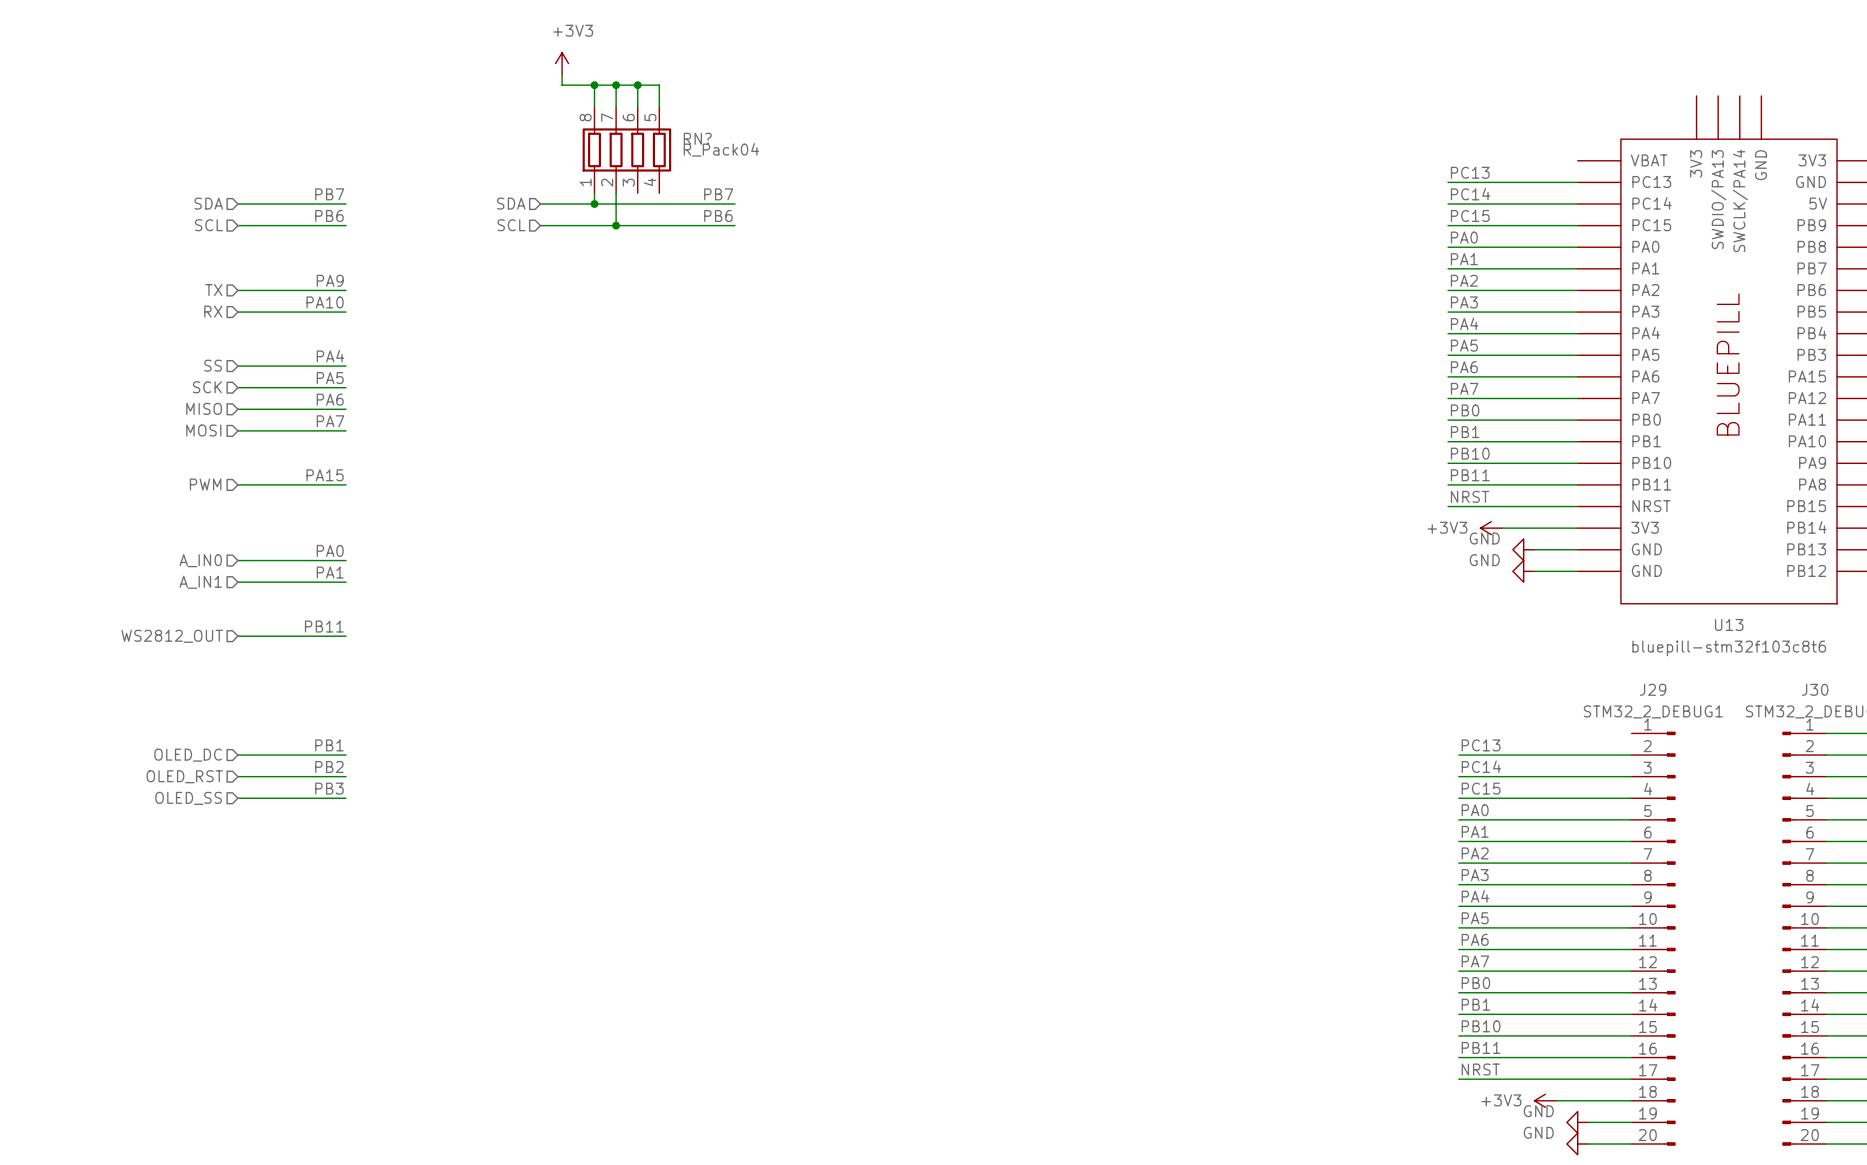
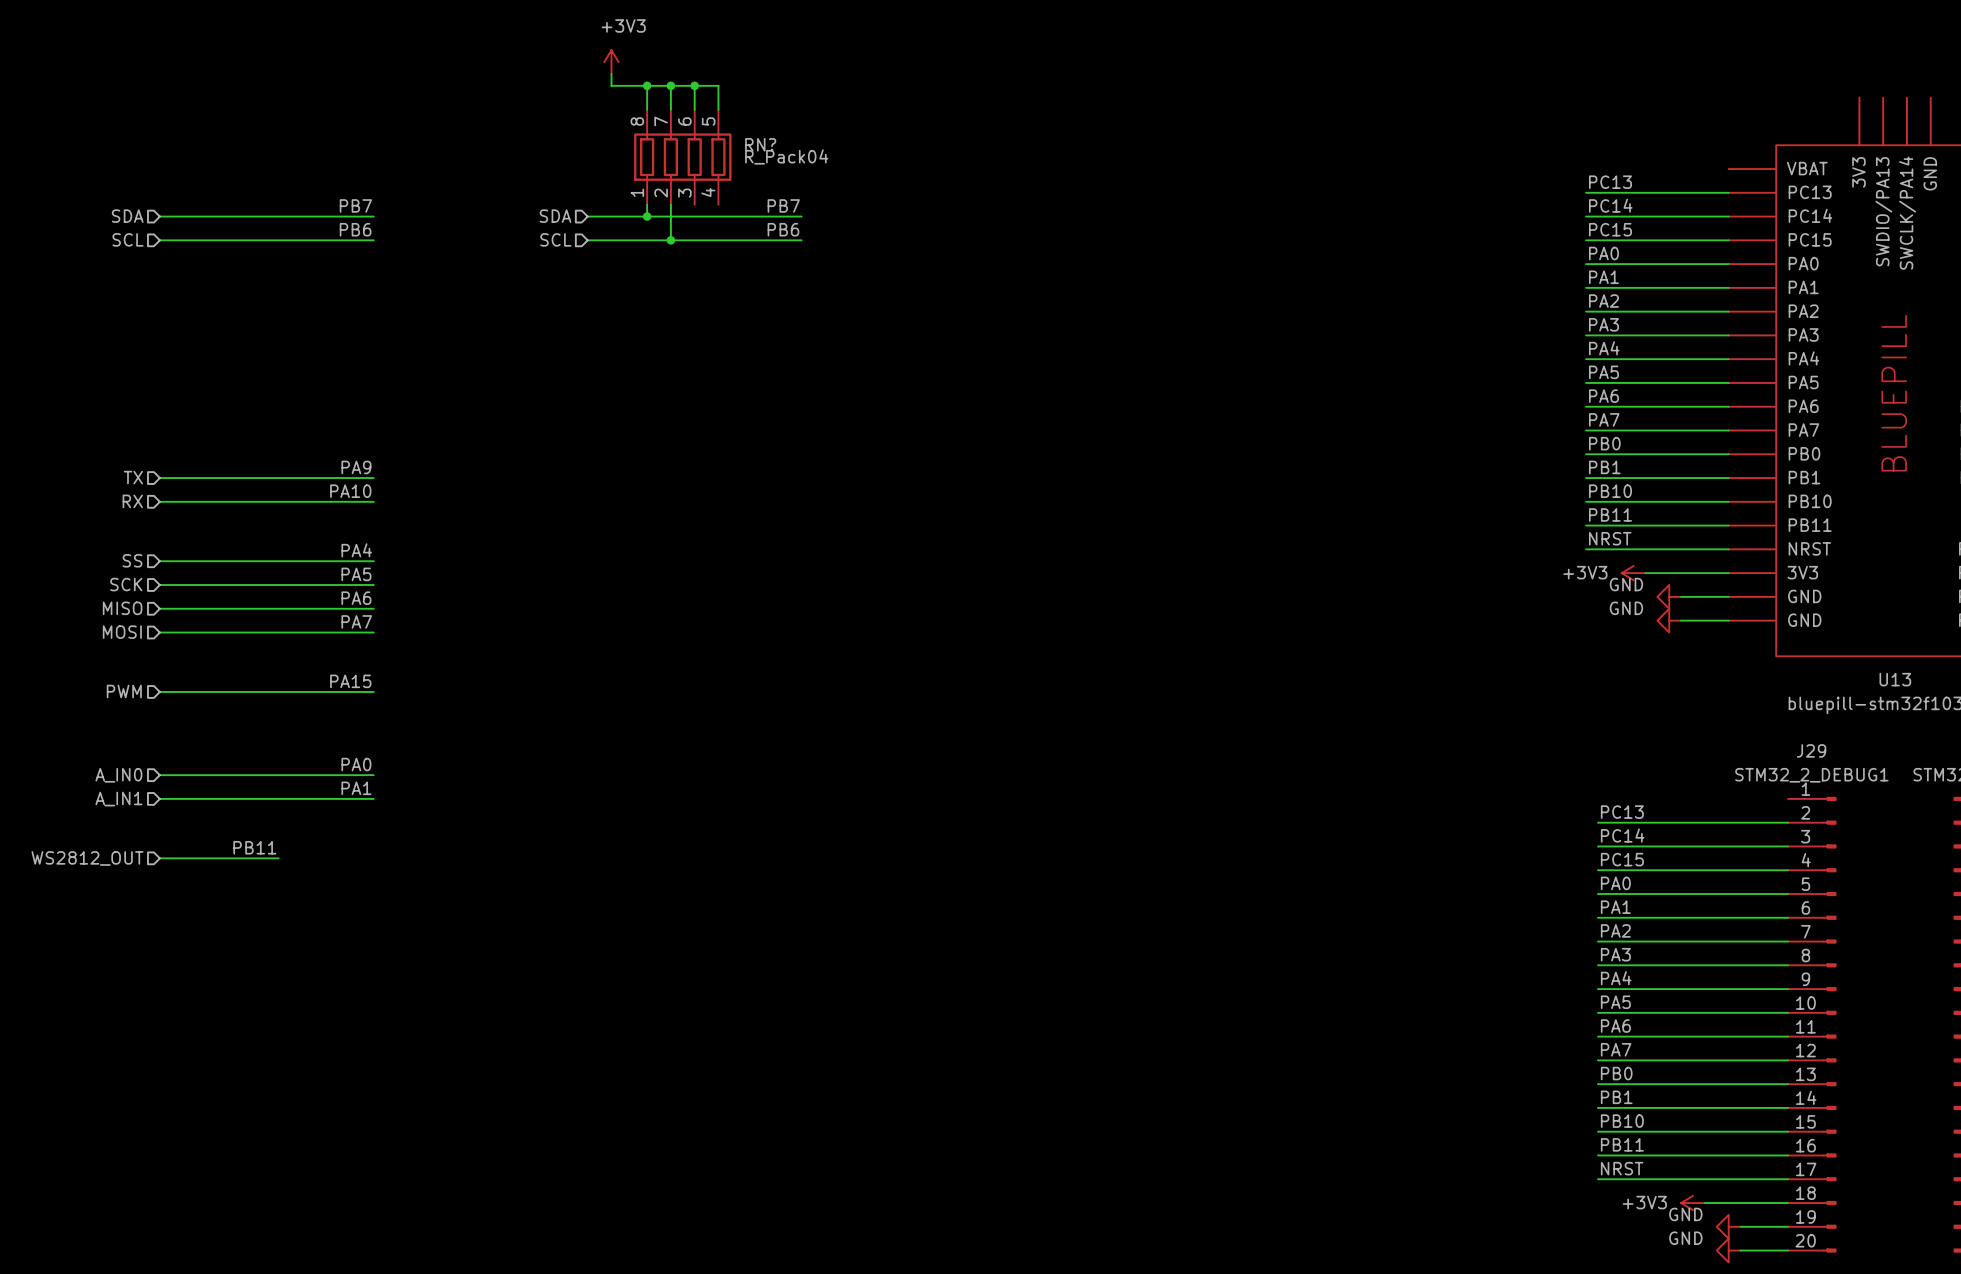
hierarchical label position: SDA (208, 203) -> SDA (127, 216)
wire: none -> (159, 216) (254, 216)
wire: none -> (159, 240) (254, 240)
hierarchical label position: SCL (208, 225) -> SCL (127, 239)
label position: PA9 (330, 280) -> PA9 (356, 467)
hierarchical label position: TX (213, 290) -> TX (133, 477)
wire: (237, 290) (345, 290) -> none
label position: PA10 (325, 302) -> PA10 (350, 491)
hierarchical label position: RX (213, 311) -> RX (132, 501)
wire: (237, 312) (345, 312) -> none
label position: PA4 (330, 356) -> PA4 (356, 550)
hierarchical label position: SS (213, 365) -> SS (132, 560)
wire: (237, 366) (345, 366) -> none
label position: PA5 (330, 378) -> PA5 (356, 574)
hierarchical label position: SCK (207, 387) -> SCK (126, 584)
wire: (237, 387) (345, 387) -> none
label: PA6 (330, 399) -> none
hierarchical label position: MISO (204, 408) -> MISO (122, 608)
wire: (237, 409) (345, 409) -> none
label: PA7 (330, 421) -> none
hierarchical label position: MOSI (203, 430) -> MOSI (122, 632)
wire: (237, 430) (345, 430) -> none
wire: none -> (159, 478) (373, 478)
wire: none -> (159, 501) (373, 501)
label: PA15 (325, 475) -> none
hierarchical label position: PWM (205, 484) -> PWM (124, 691)
wire: (237, 484) (345, 484) -> none
wire: none -> (159, 561) (373, 561)
wire: none -> (159, 584) (373, 584)
label: PA0 (330, 550) -> PA6 (356, 598)
wire: none -> (159, 608) (254, 608)
hierarchical label position: A_IN0 (200, 560) -> A_IN0 (118, 775)
label: PA1 (330, 572) -> PA7 (356, 621)
wire: none -> (159, 632) (254, 632)
hierarchical label position: A_IN1 (200, 582) -> A_IN1 (118, 799)
label: PB11 (324, 626) -> PA15 (350, 681)
wire: none -> (159, 691) (254, 691)
hierarchical label position: WS2812_OUT (172, 636) -> WS2812_OUT (87, 858)
label: none -> PA0 (356, 764)
wire: none -> (159, 775) (373, 775)
wire: none -> (159, 798) (373, 798)
label: PB1 (329, 745) -> PA1 (356, 788)
hierarchical label: OLED_DC (188, 755) -> none
wire: (237, 755) (345, 755) -> none
label: PB2 (329, 767) -> none
hierarchical label: OLED_RST (184, 776) -> none
wire: (237, 776) (345, 776) -> none
label: none -> PB11 (254, 847)
label: PB3 (329, 788) -> none
hierarchical label: OLED_SS (188, 798) -> none
wire: (237, 798) (345, 798) -> (159, 858) (278, 858)

